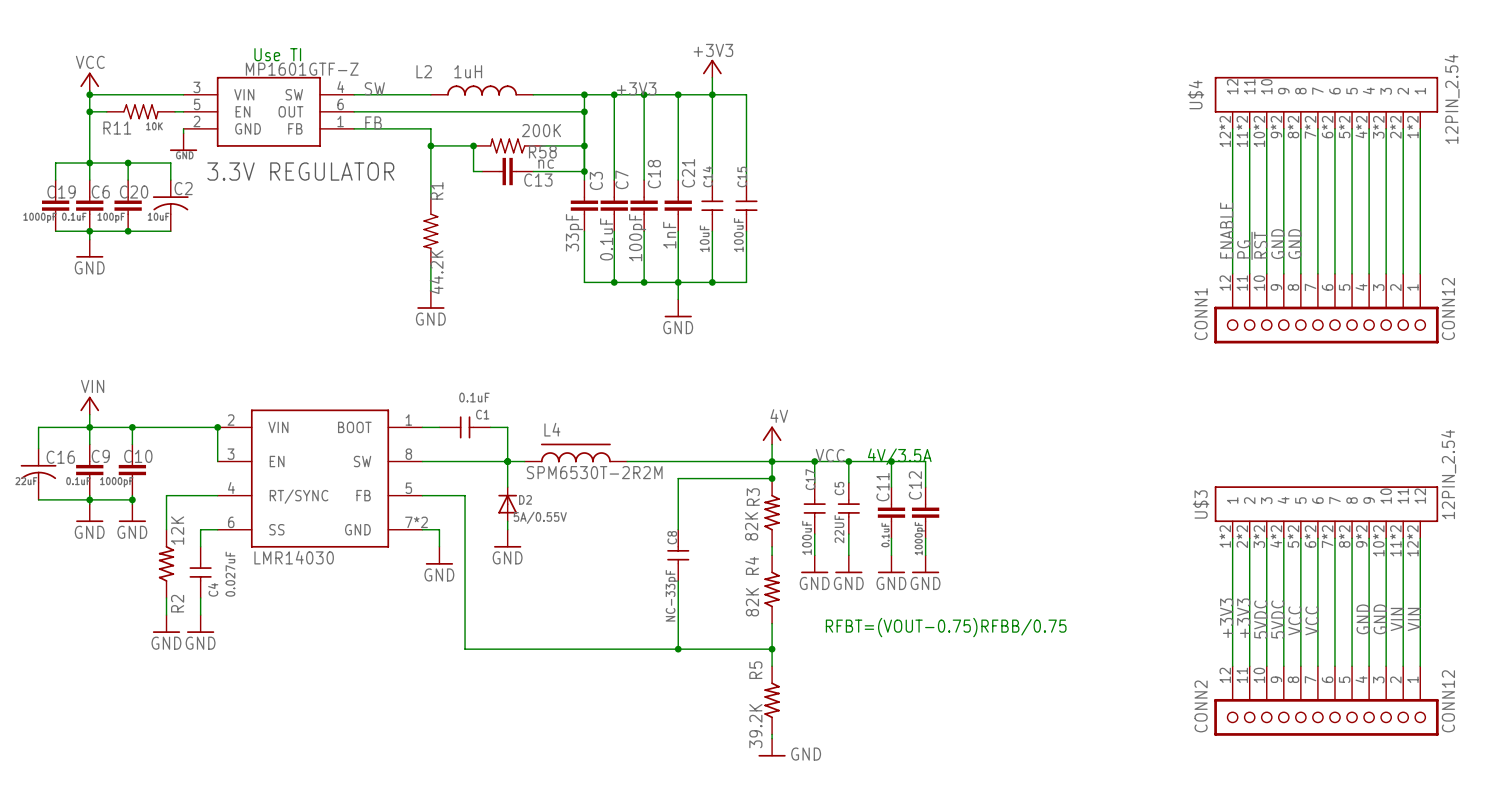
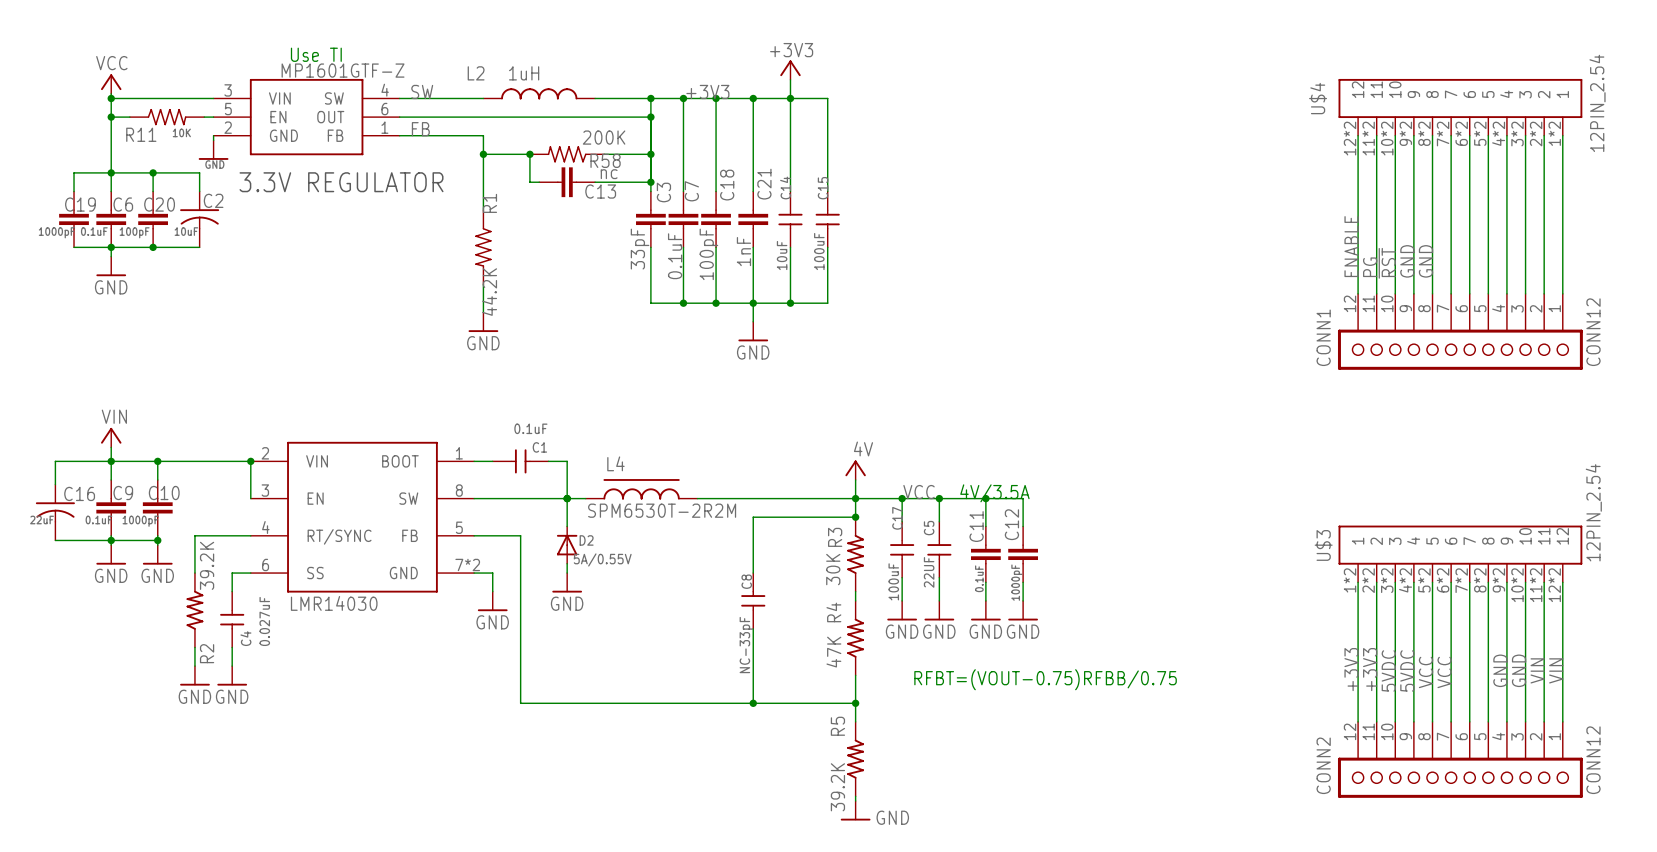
R3 value: 82K (751, 526) -> 30K (833, 569)
R2 value: 12K (177, 530) -> 39.2K (207, 565)
R4 value: 82K (752, 602) -> 47K (833, 652)

